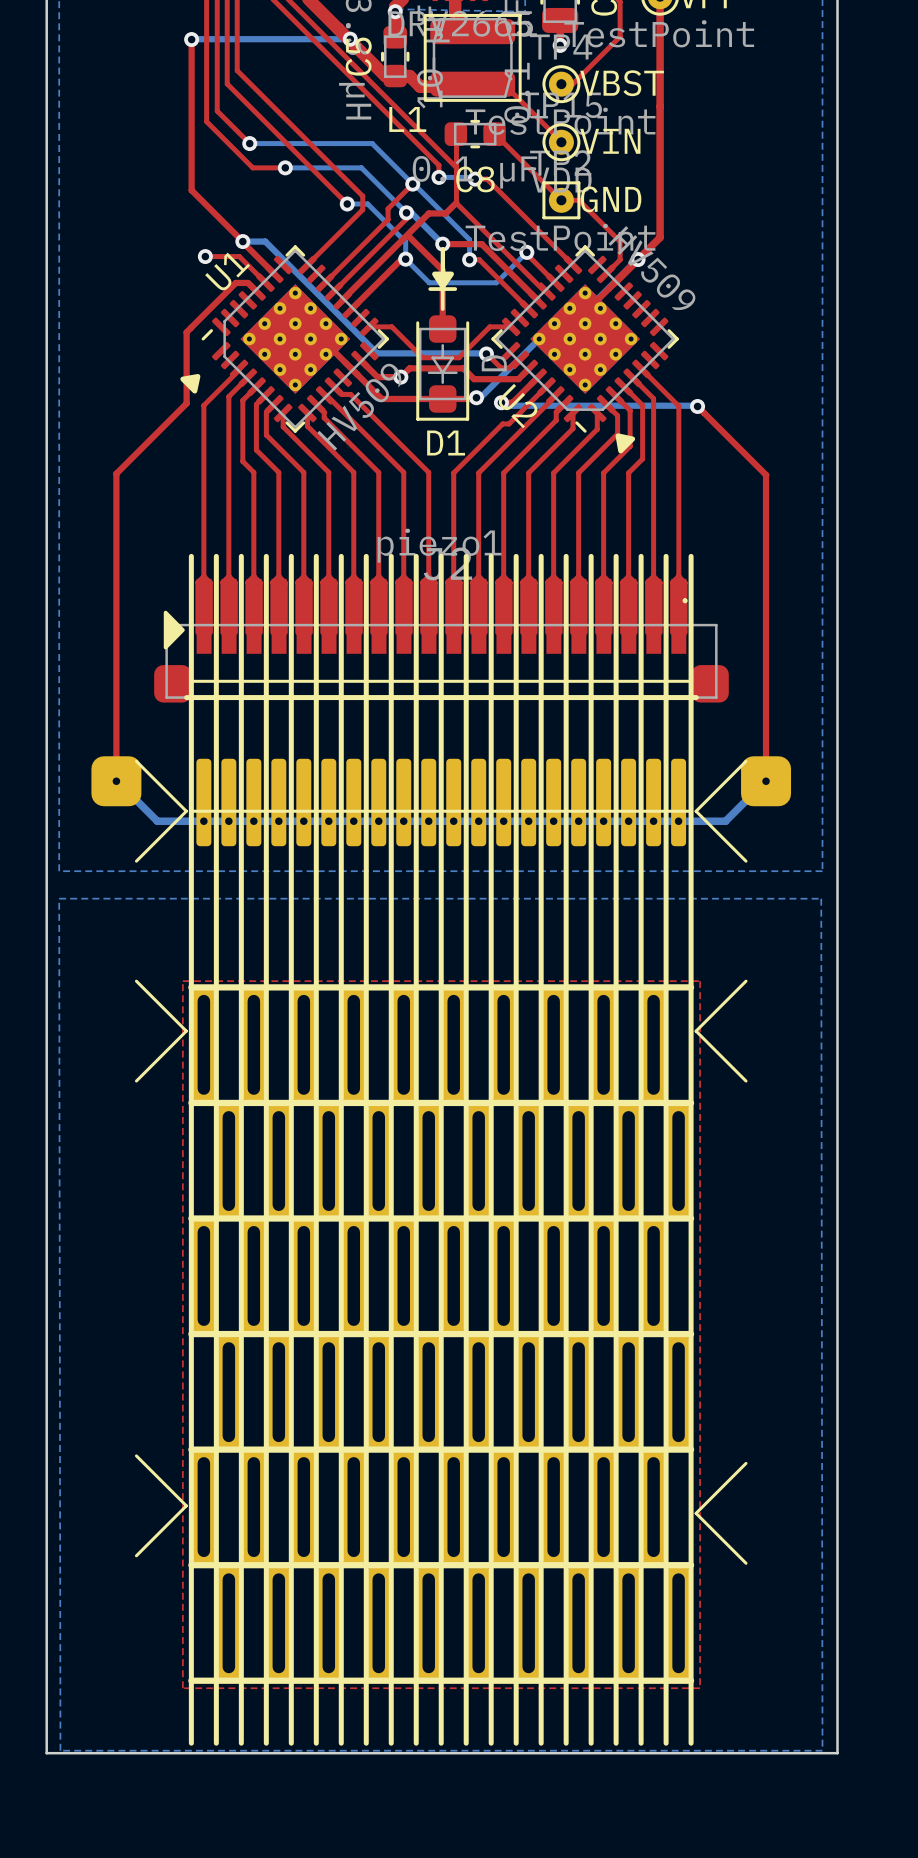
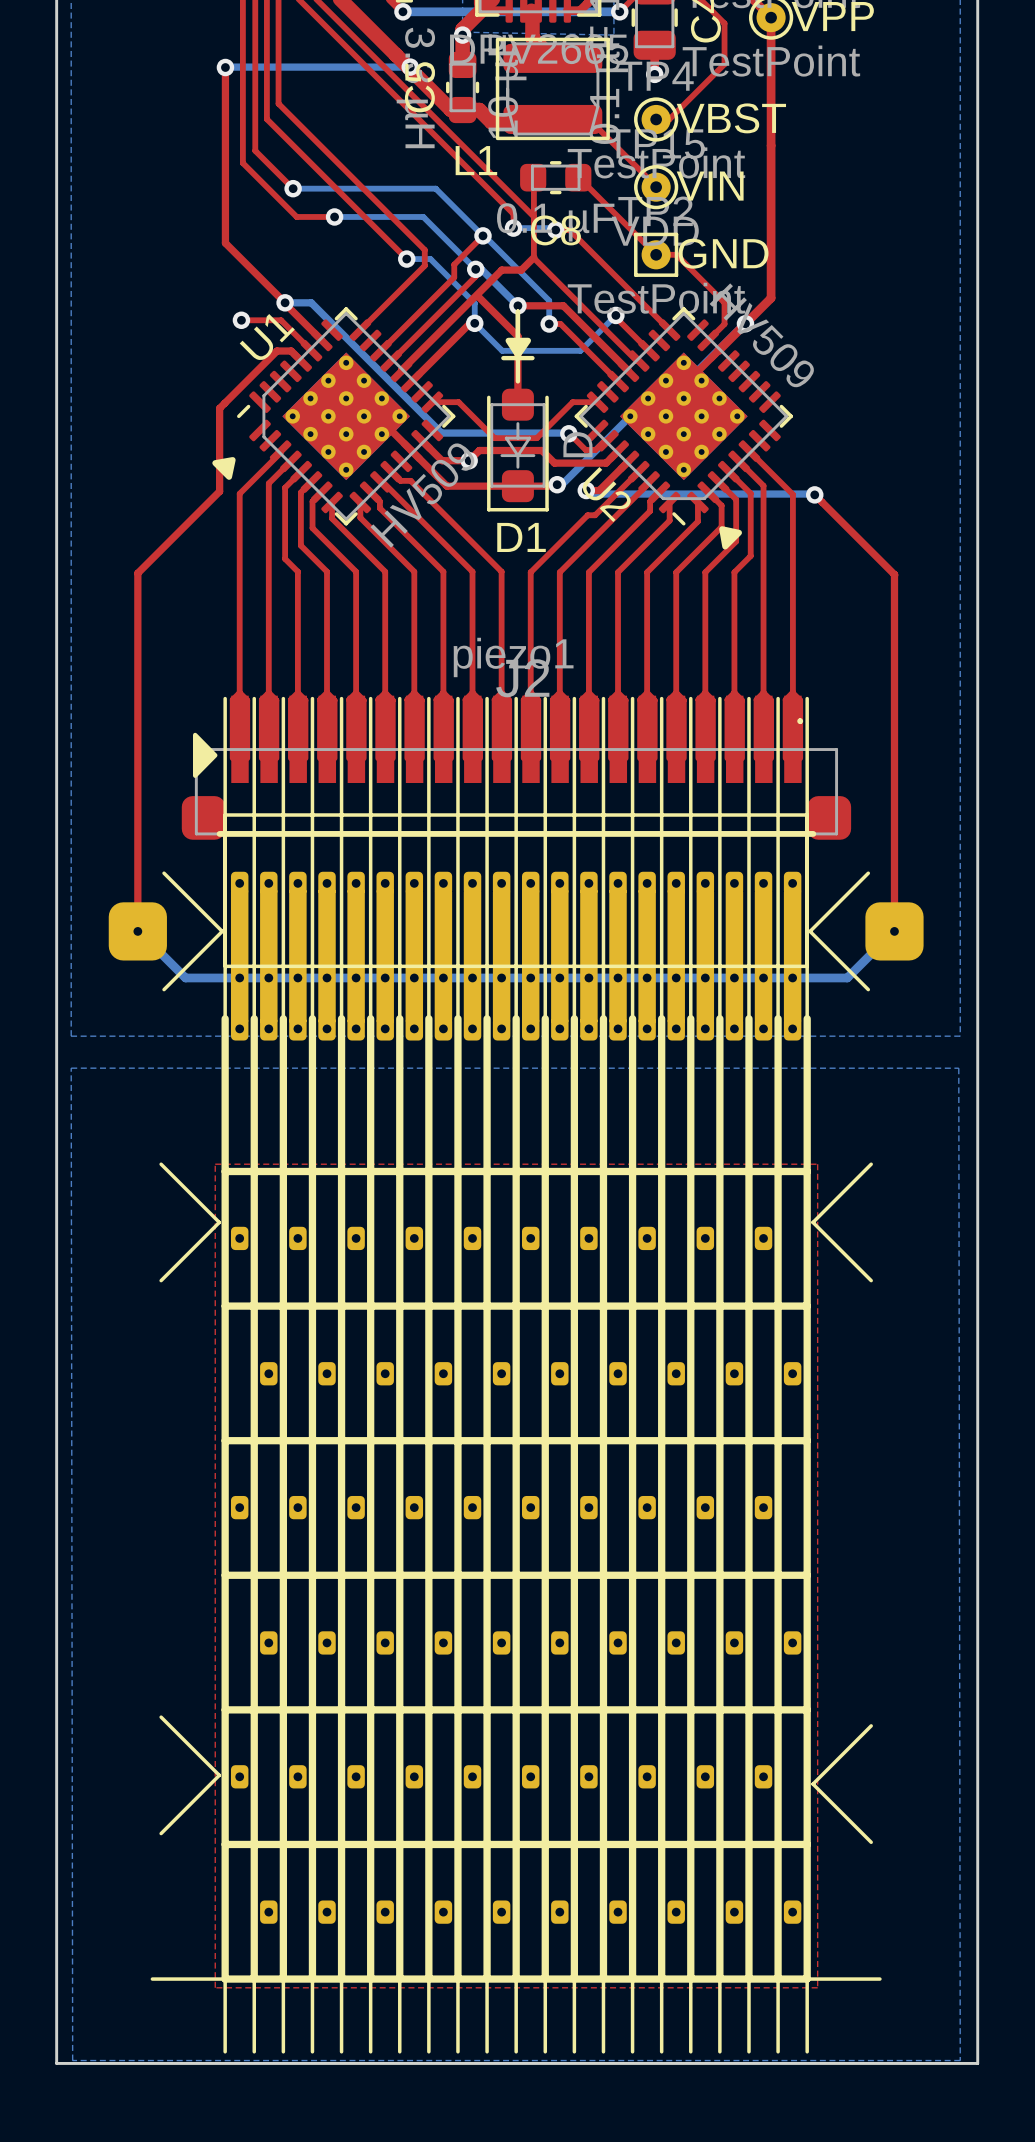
piezo1 footprint: [91, 553, 792, 1746] -> [108, 696, 924, 2054]

